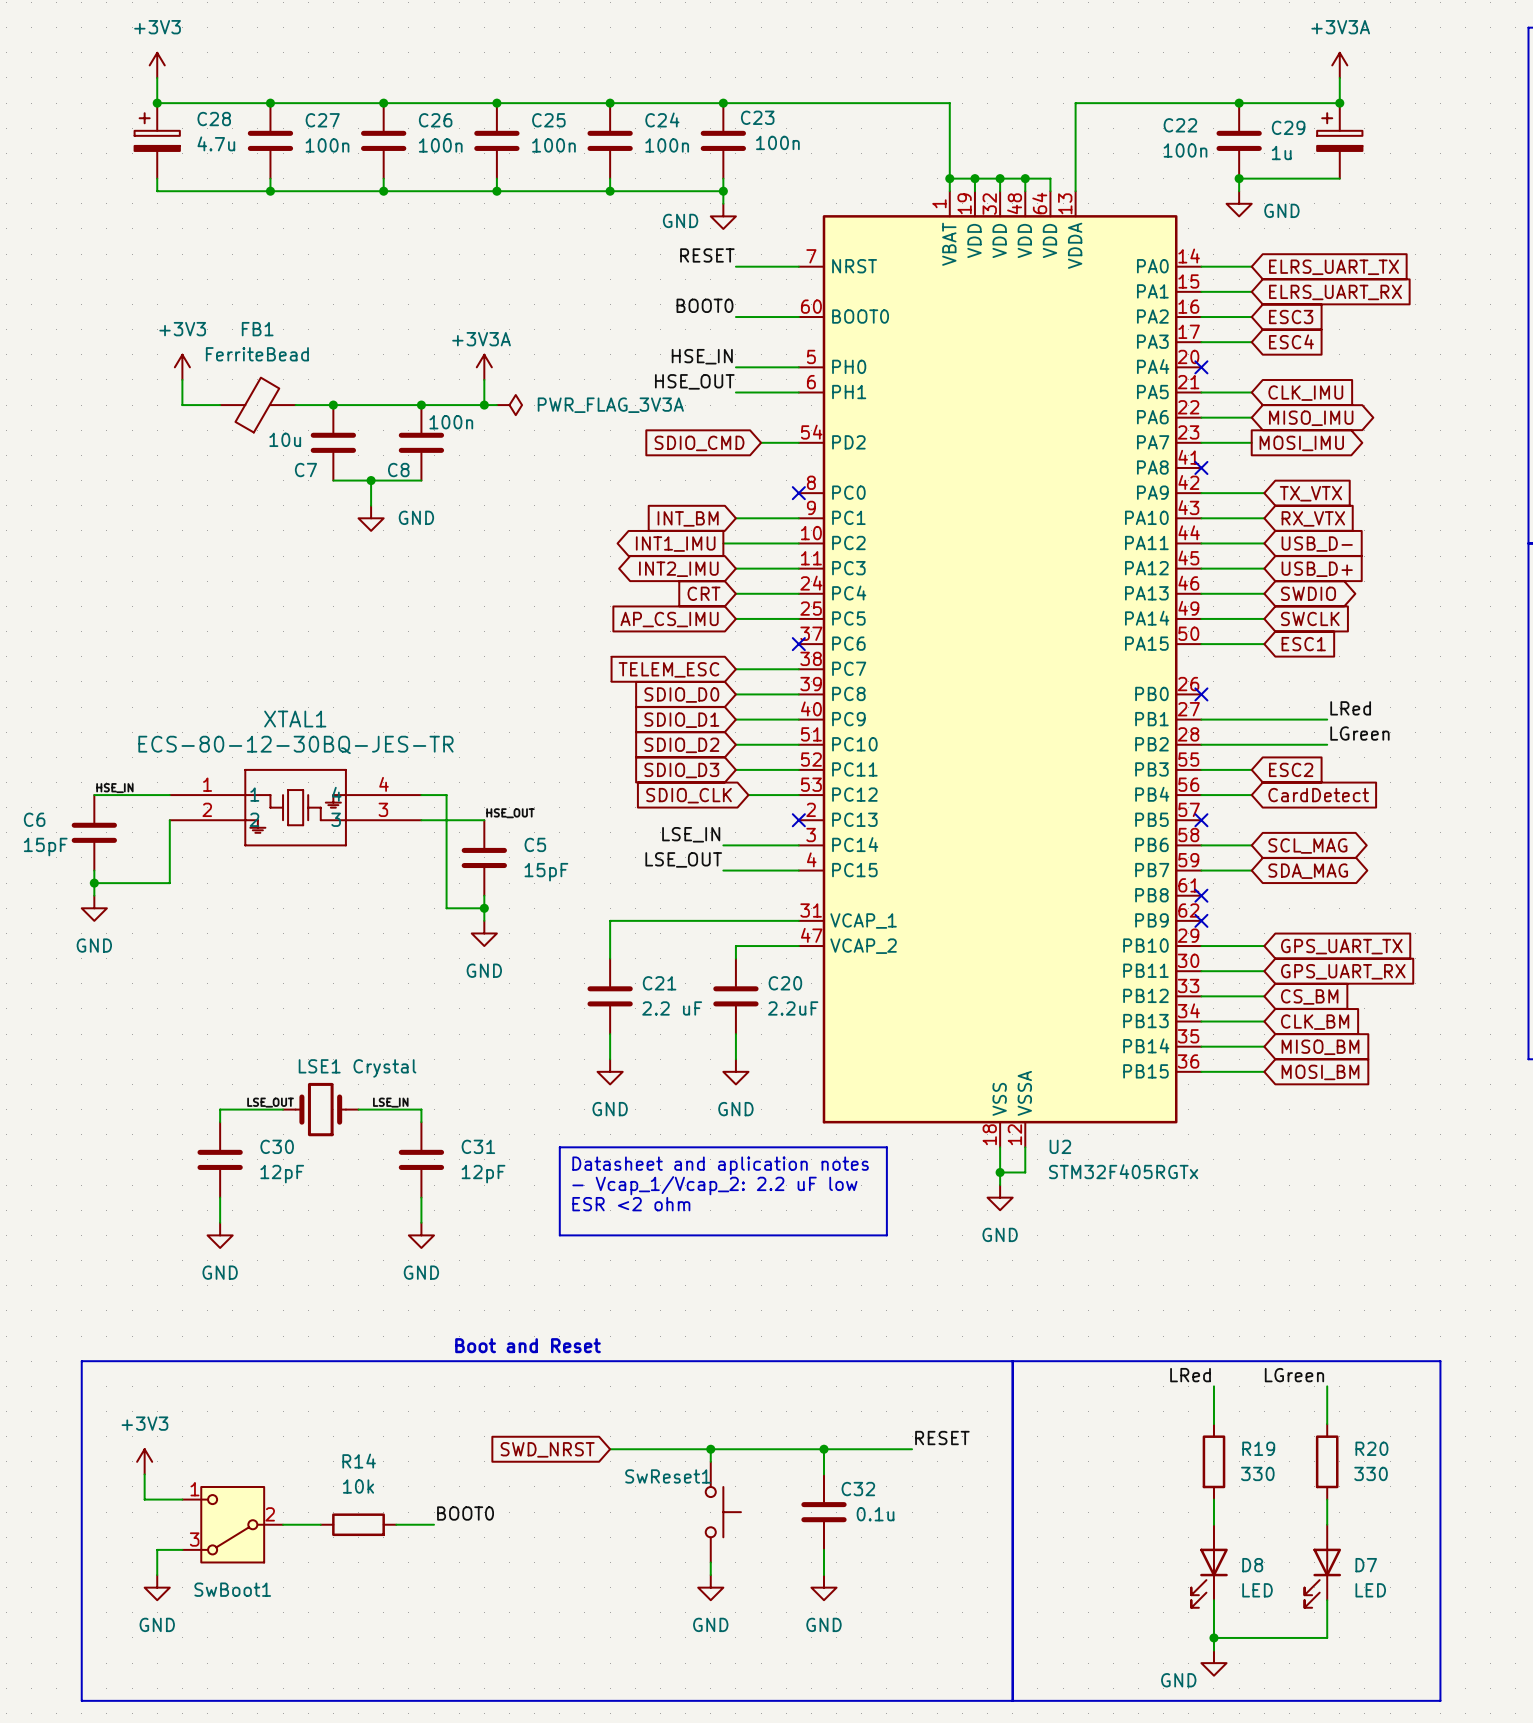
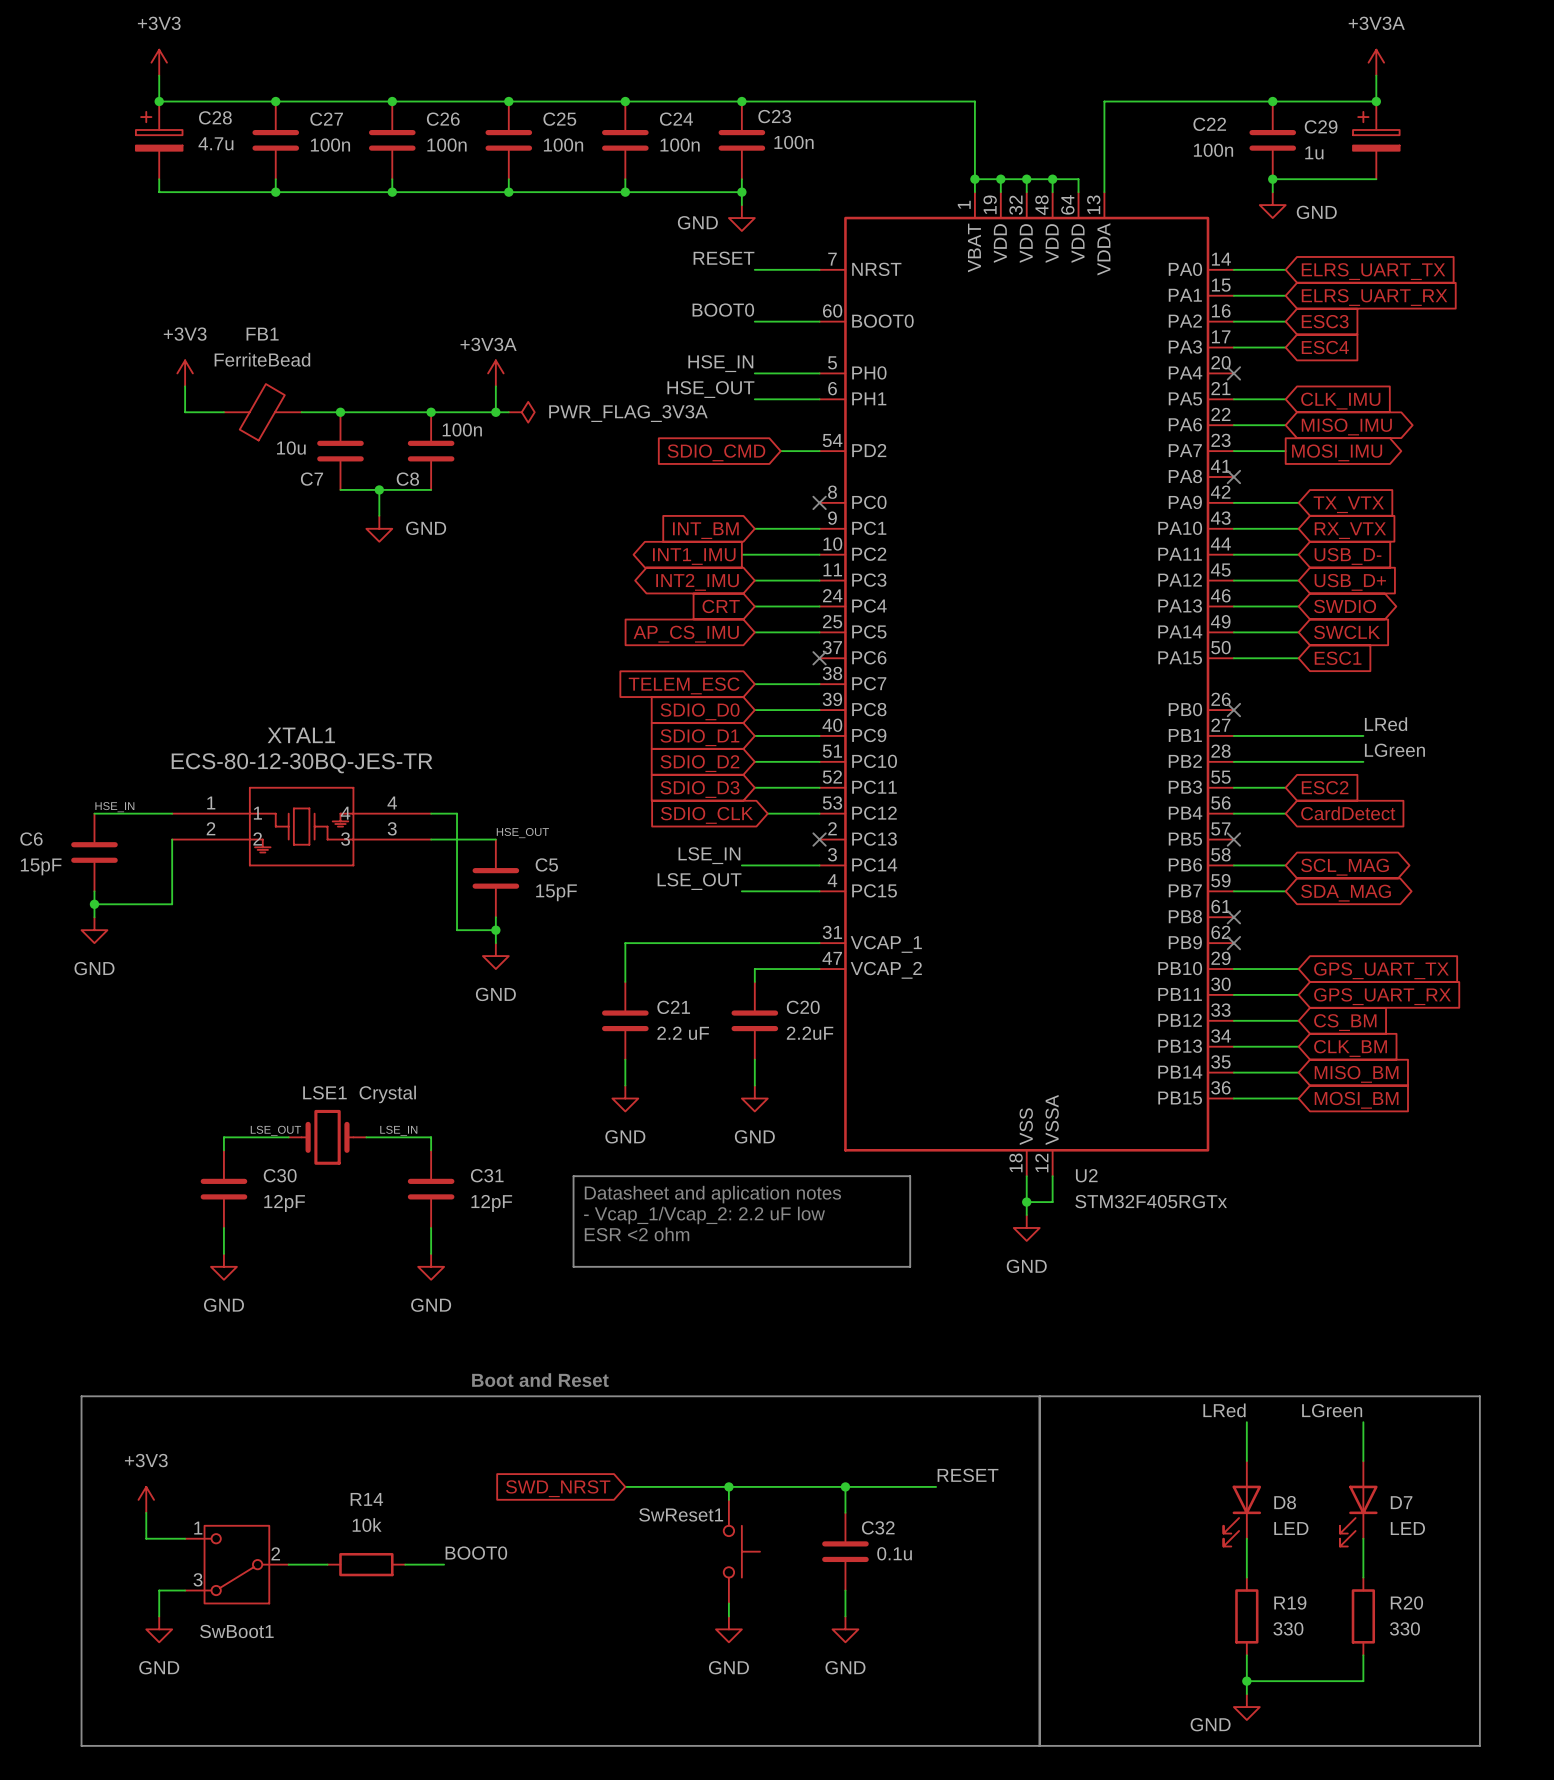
R19 position: (1213, 1461) -> (1246, 1616)
R20 position: (1327, 1461) -> (1363, 1616)
D8 position: (1209, 1566) -> (1242, 1503)
D7 position: (1322, 1566) -> (1358, 1503)

